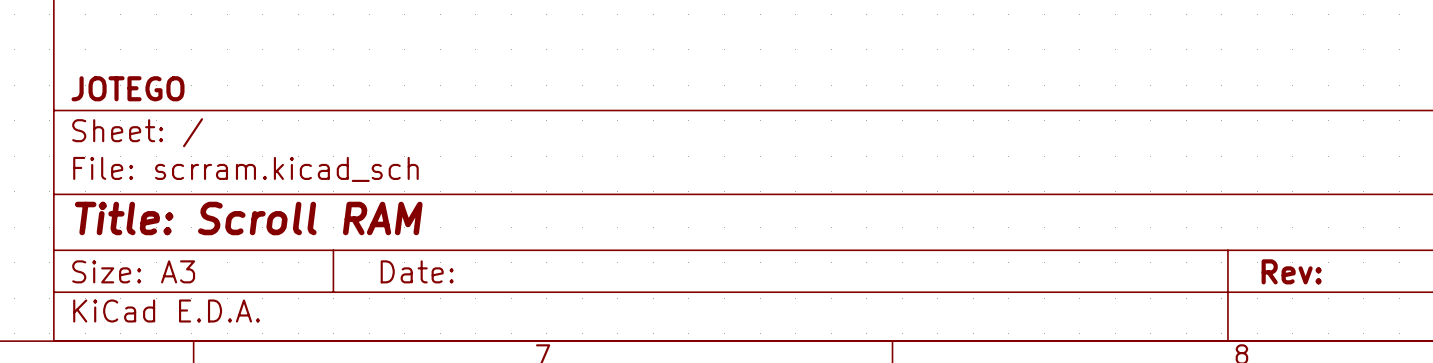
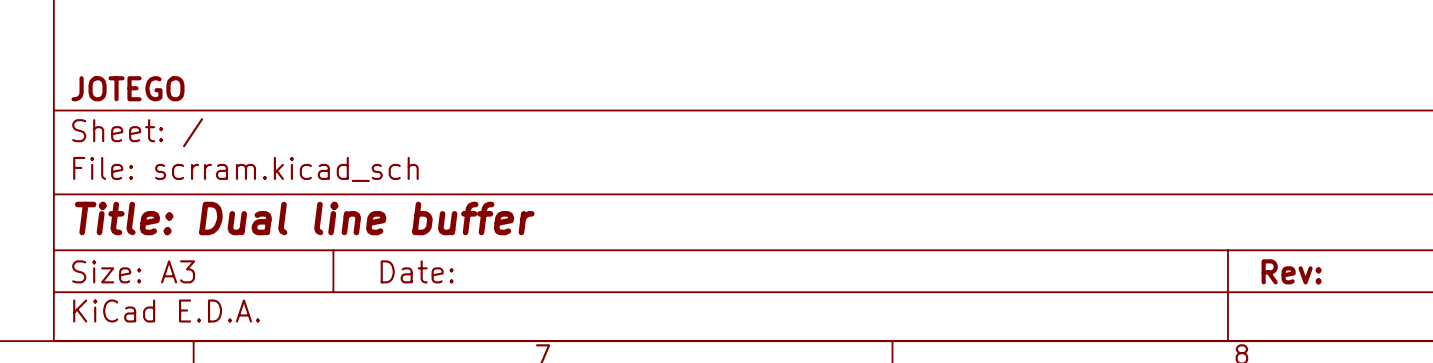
title block: Title: Scroll RAM (248, 218) -> Title: Dual line buffer (304, 218)

